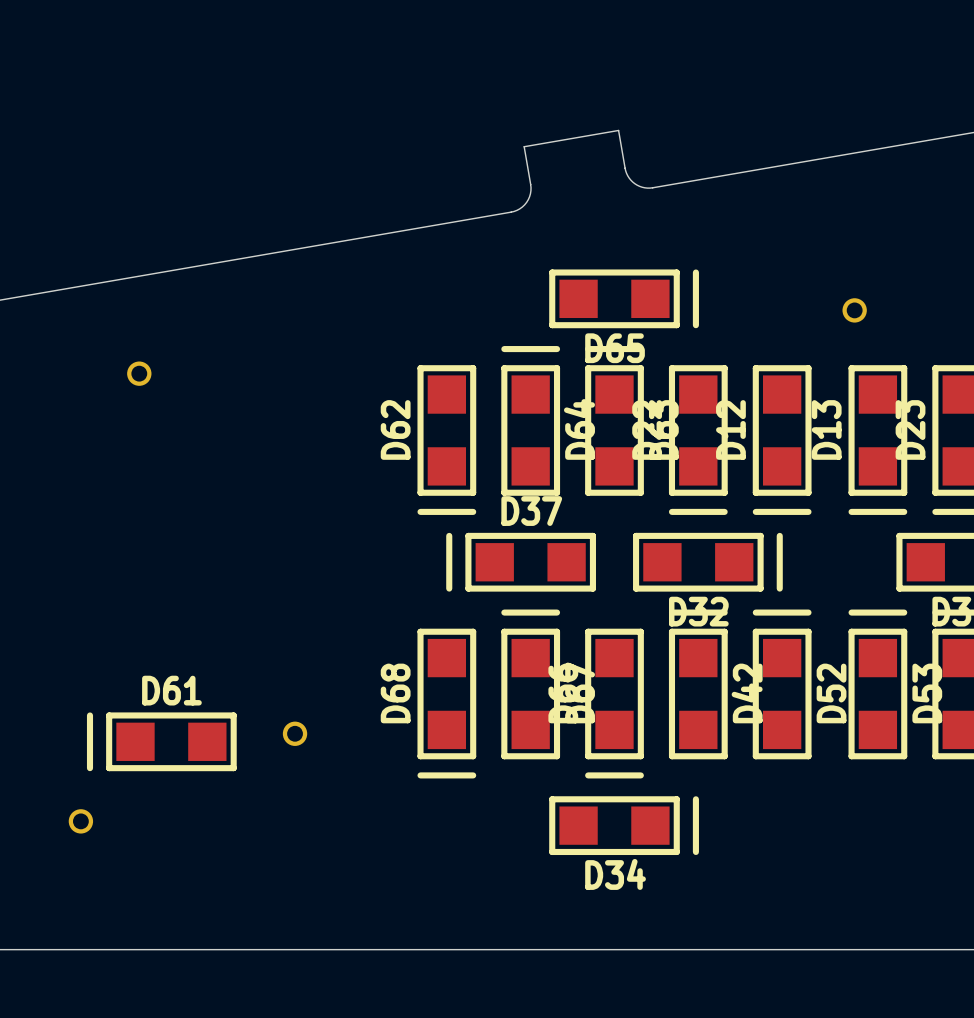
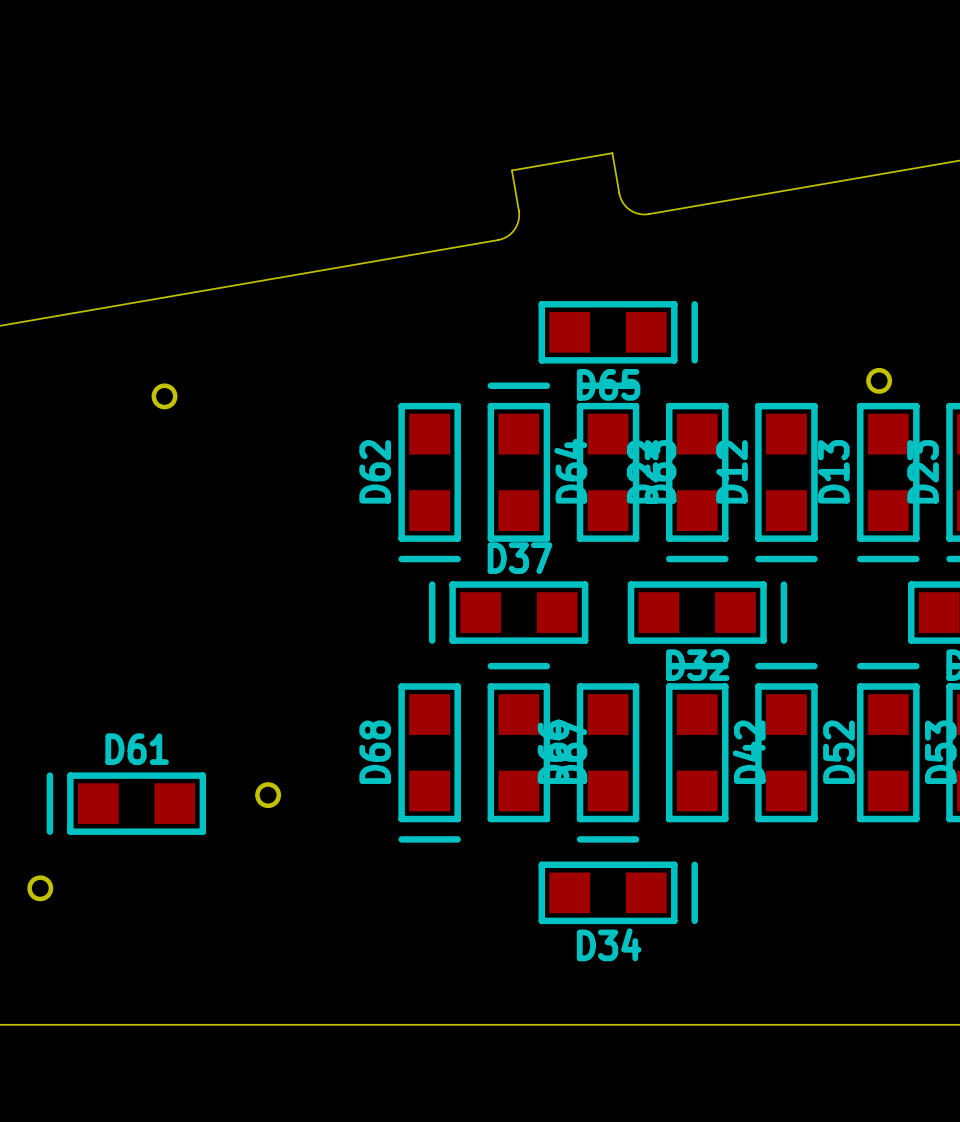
part position: (854, 310) -> (879, 380)
part position: (139, 373) -> (164, 396)

